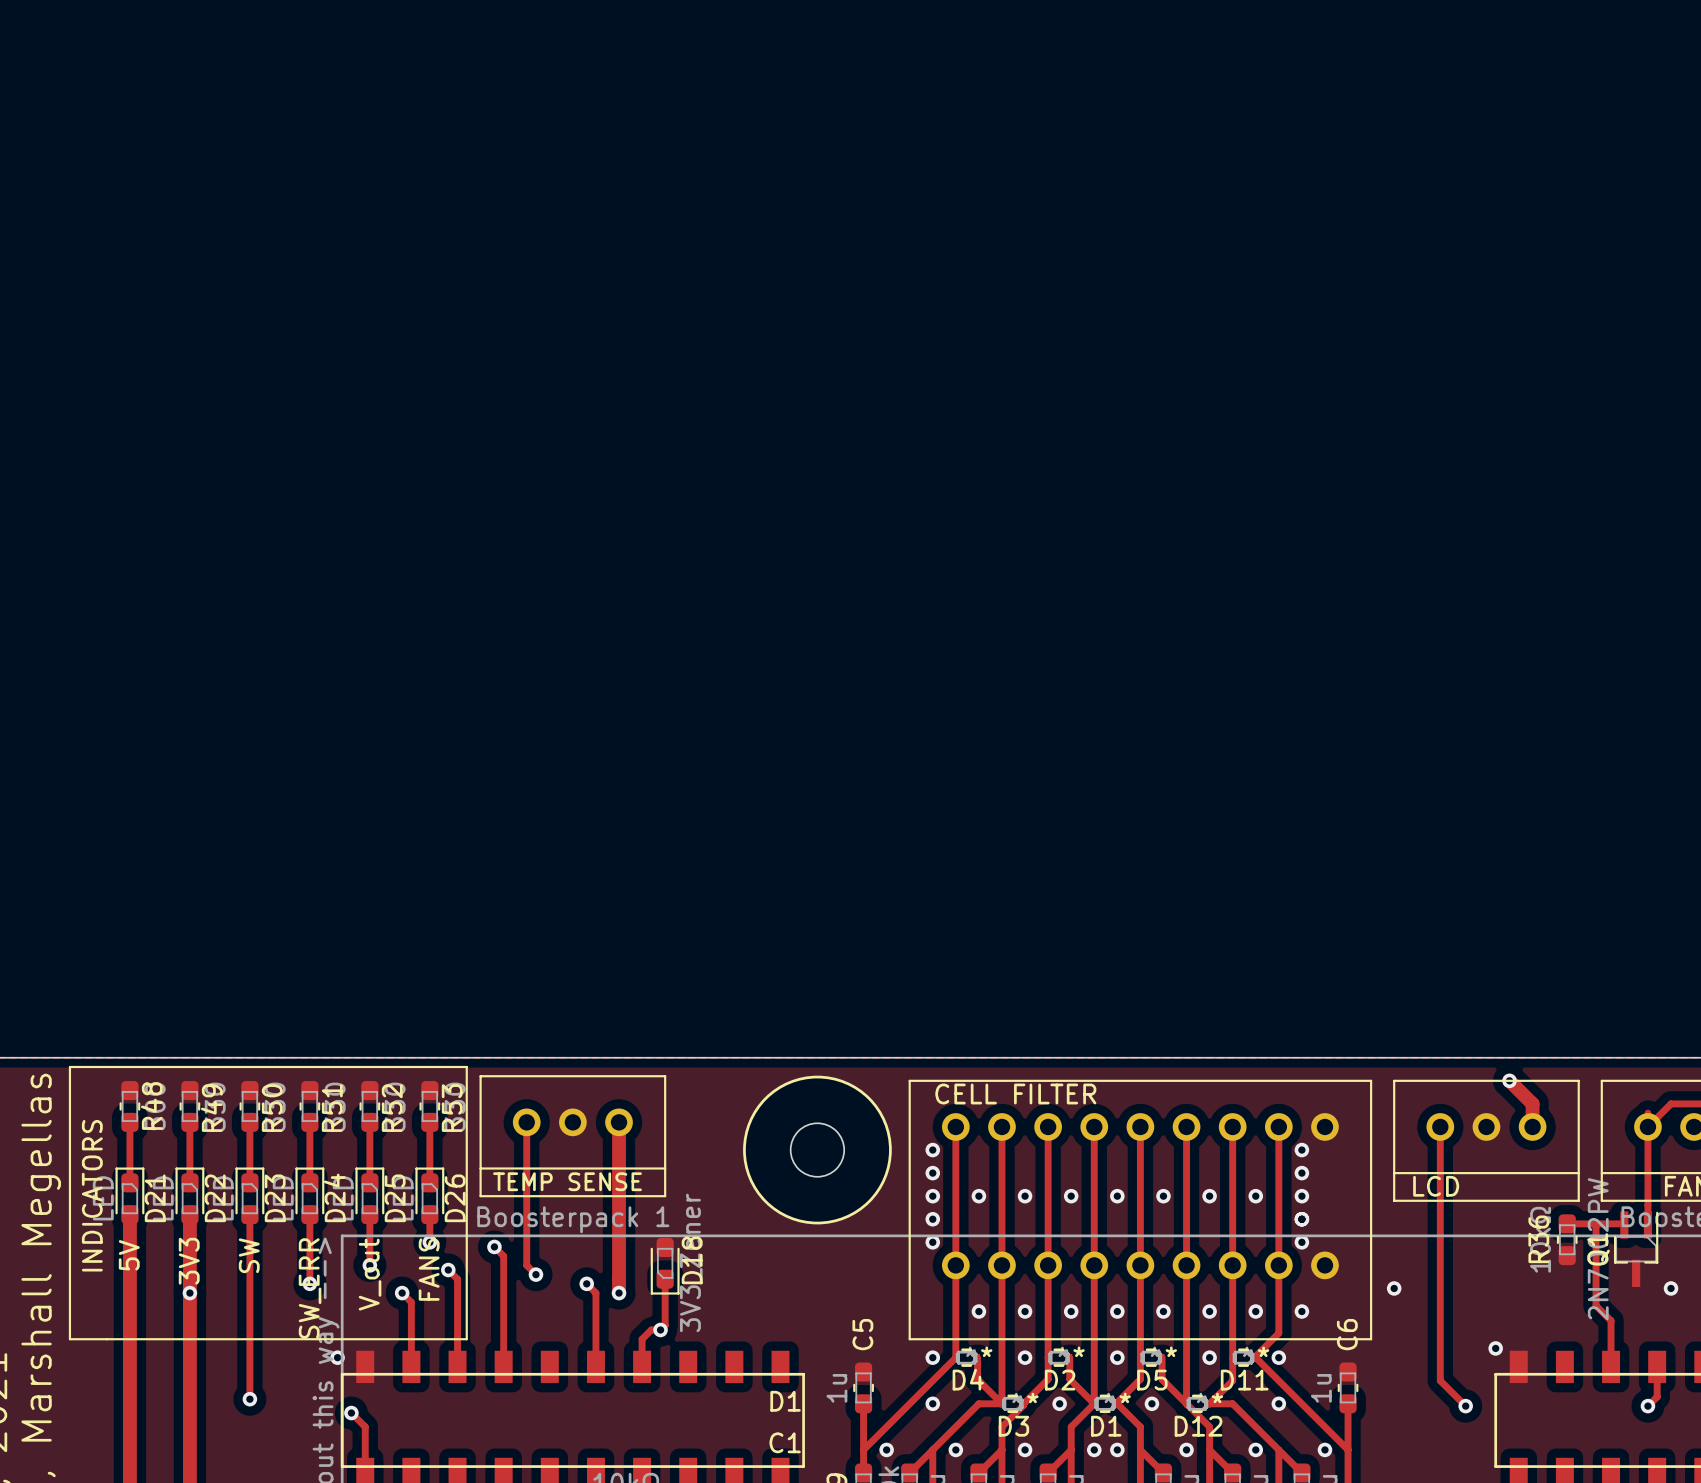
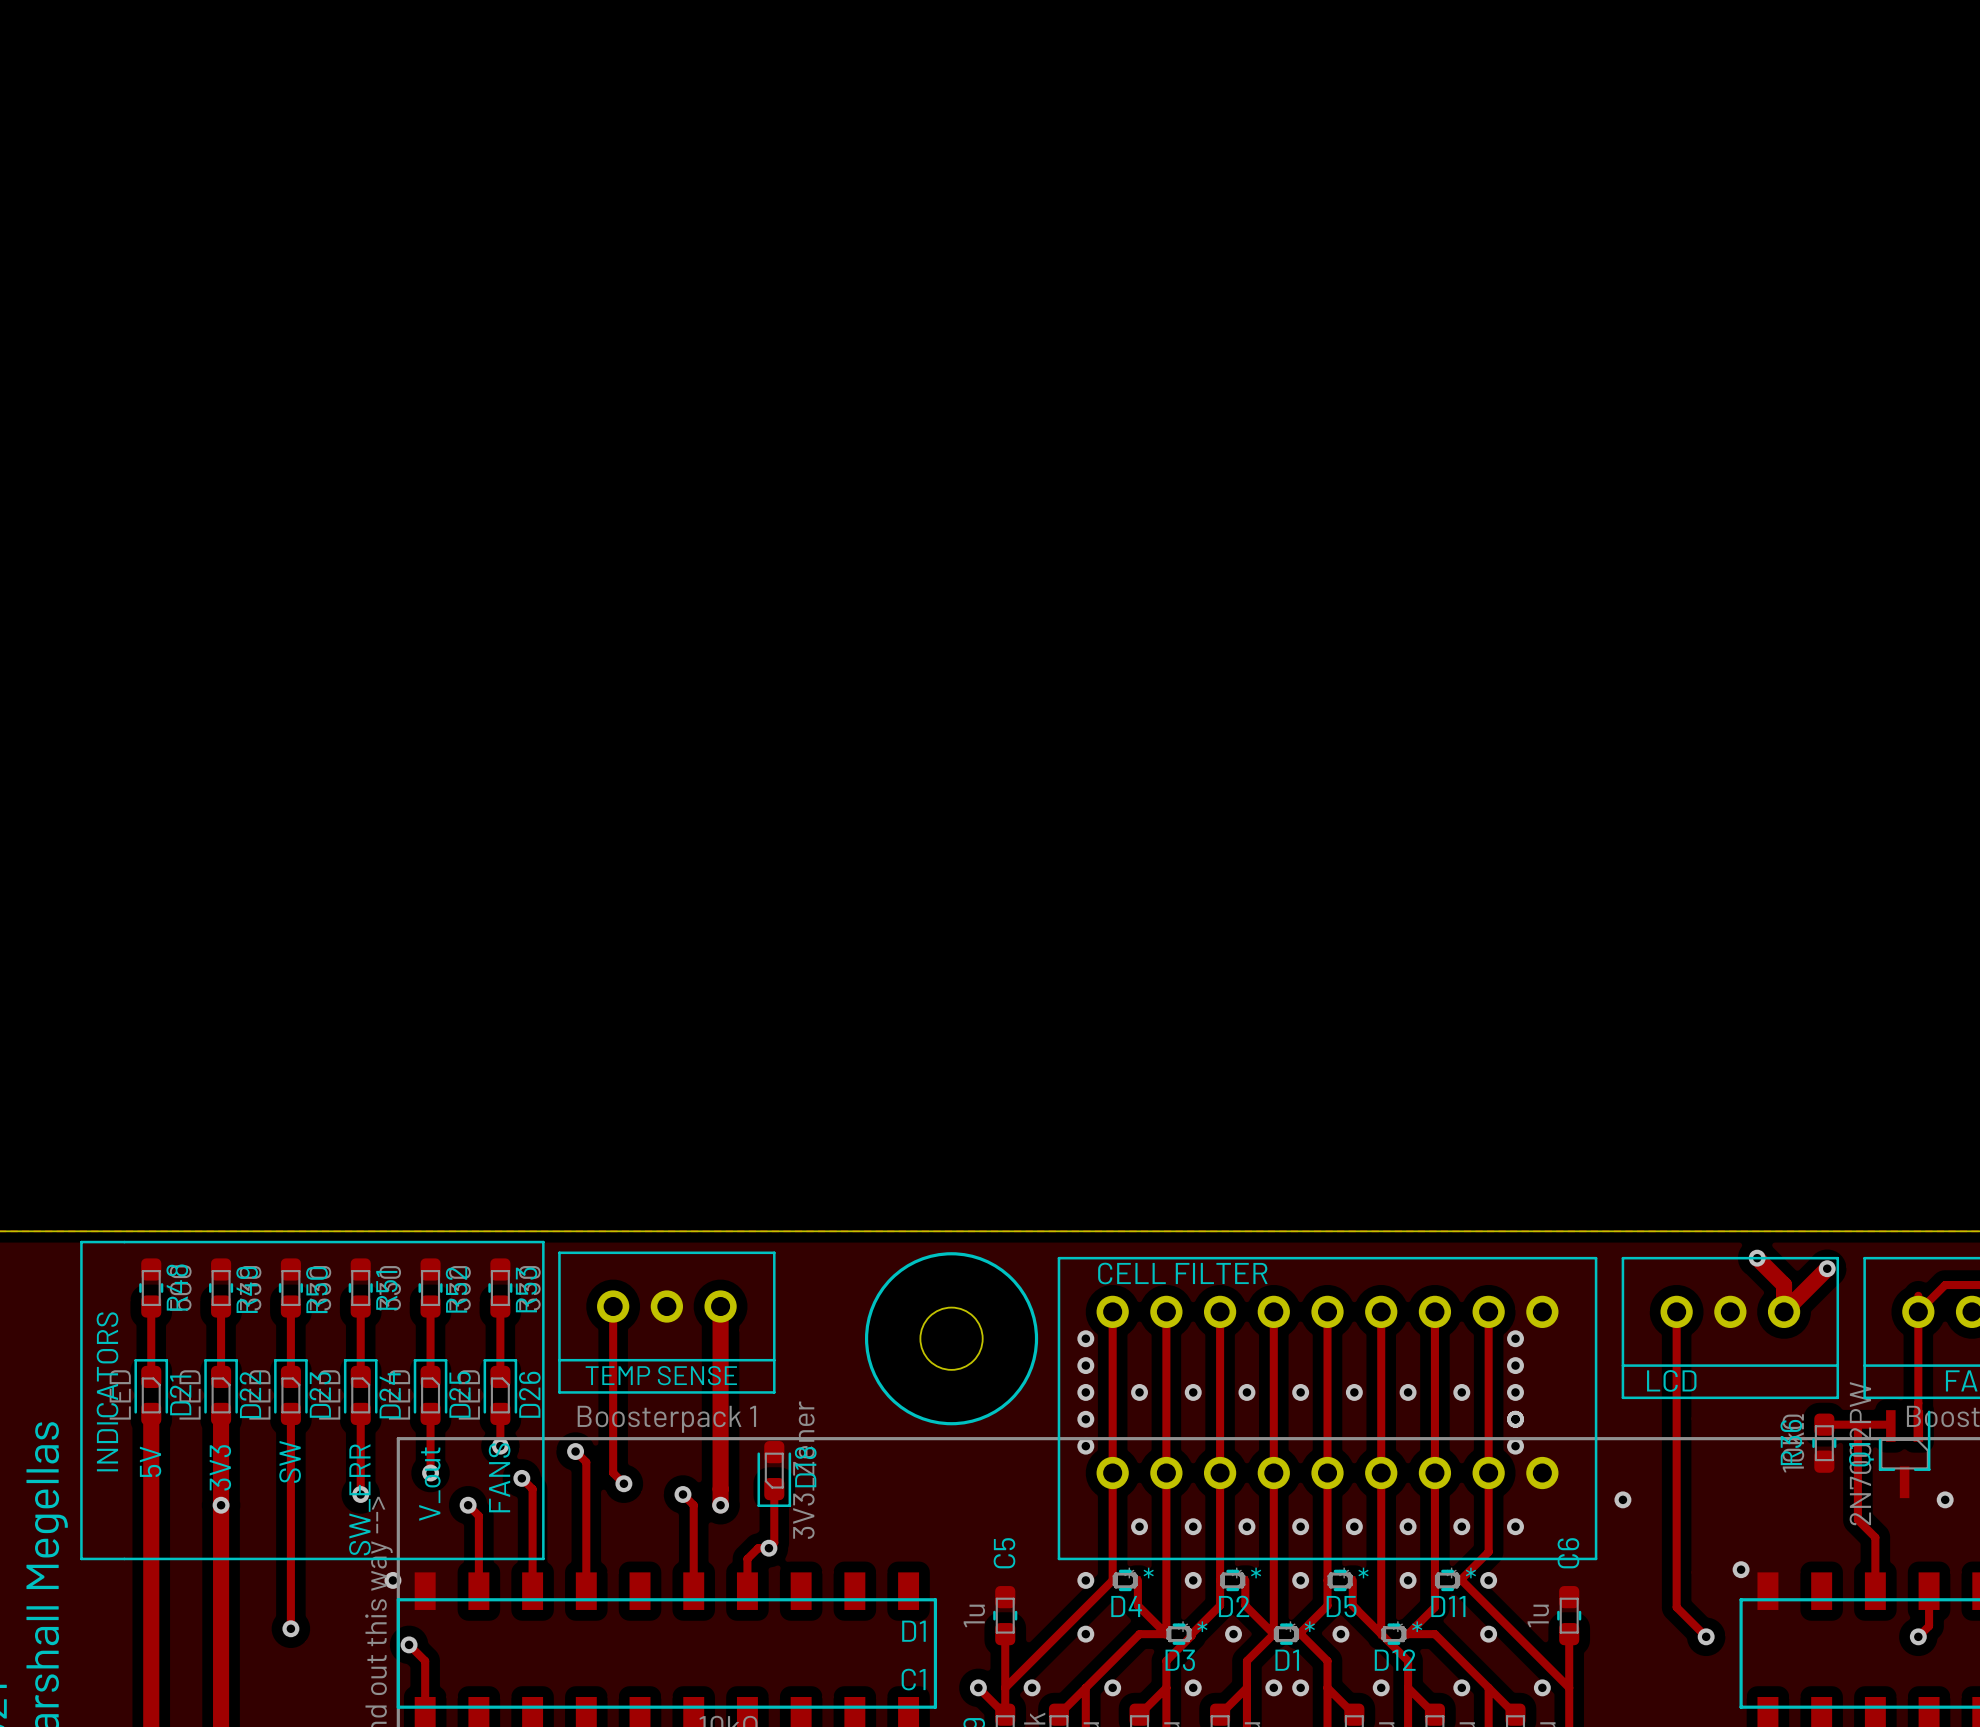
track: none -> (1827, 1268) (1784, 1311)
via: none -> (1827, 1268)
track: none -> (978, 1687) (1005, 1714)
via: none -> (978, 1687)

